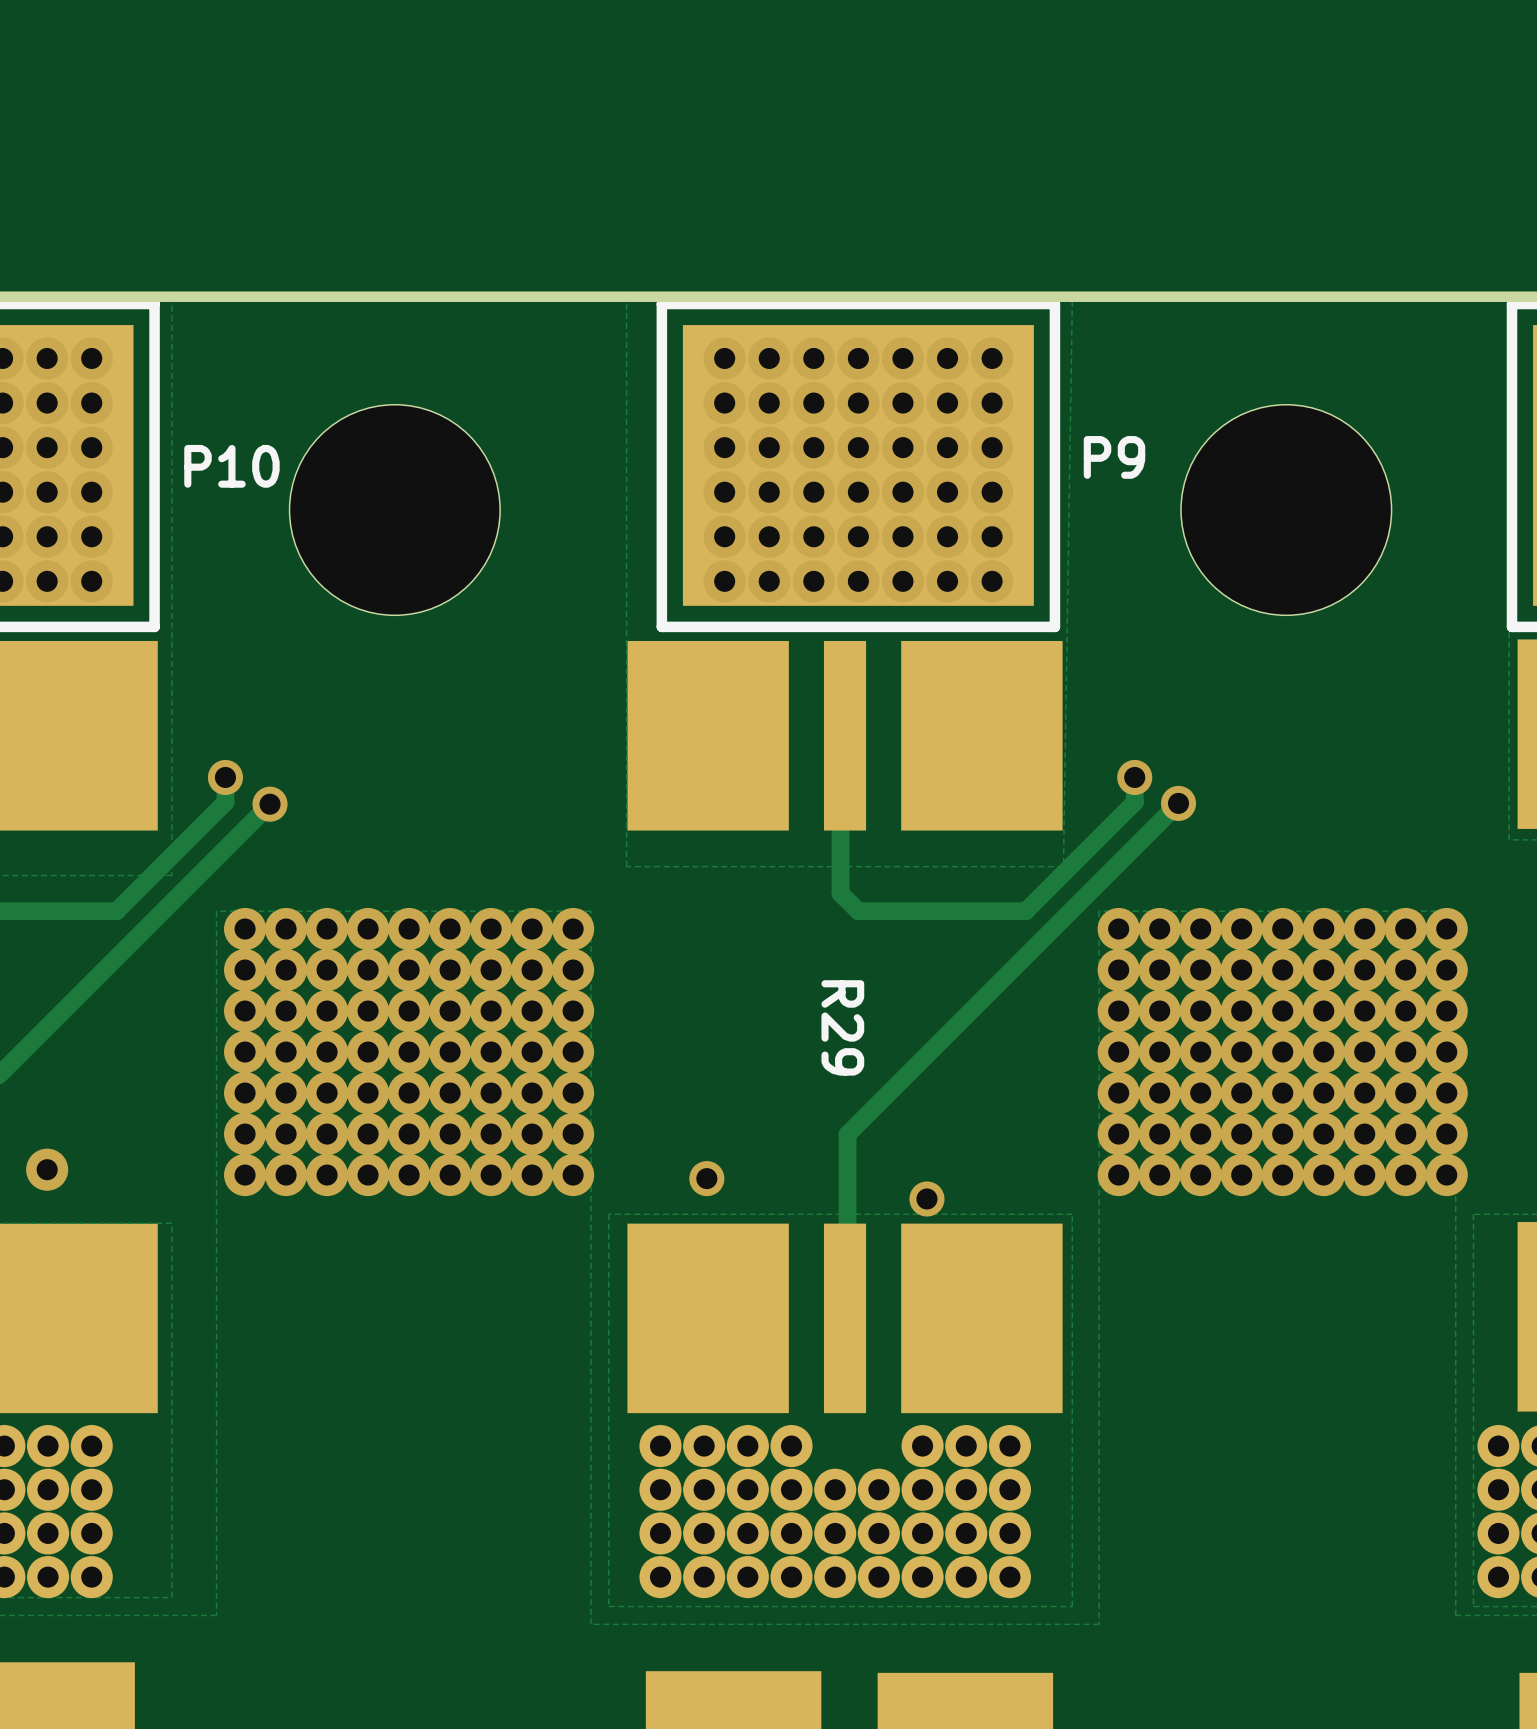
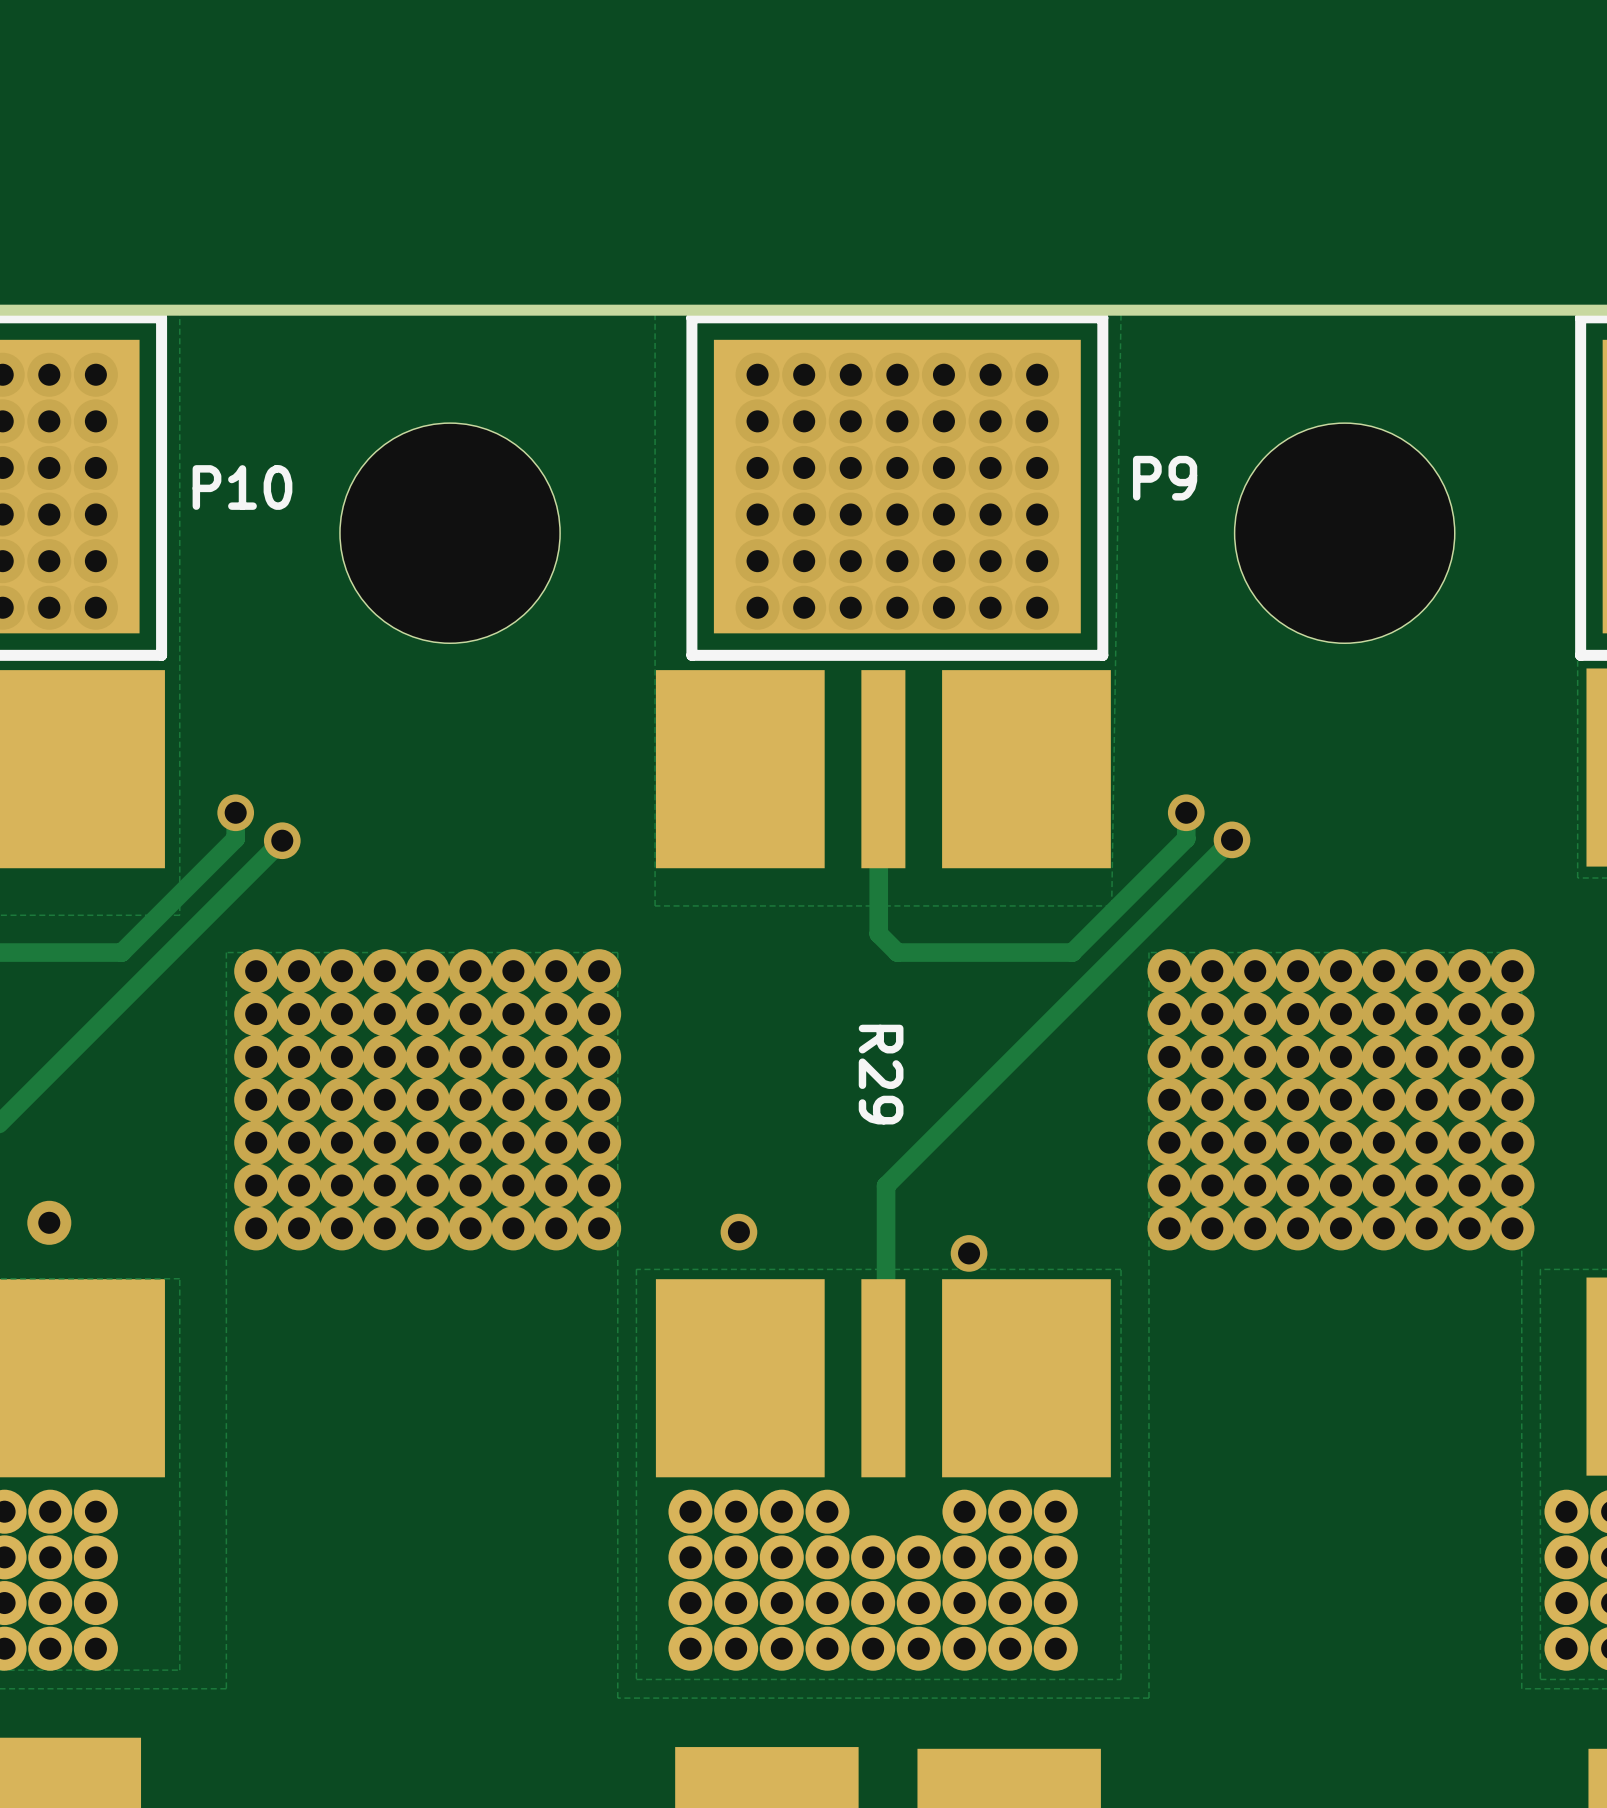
part position: (394, 510) -> (450, 533)

